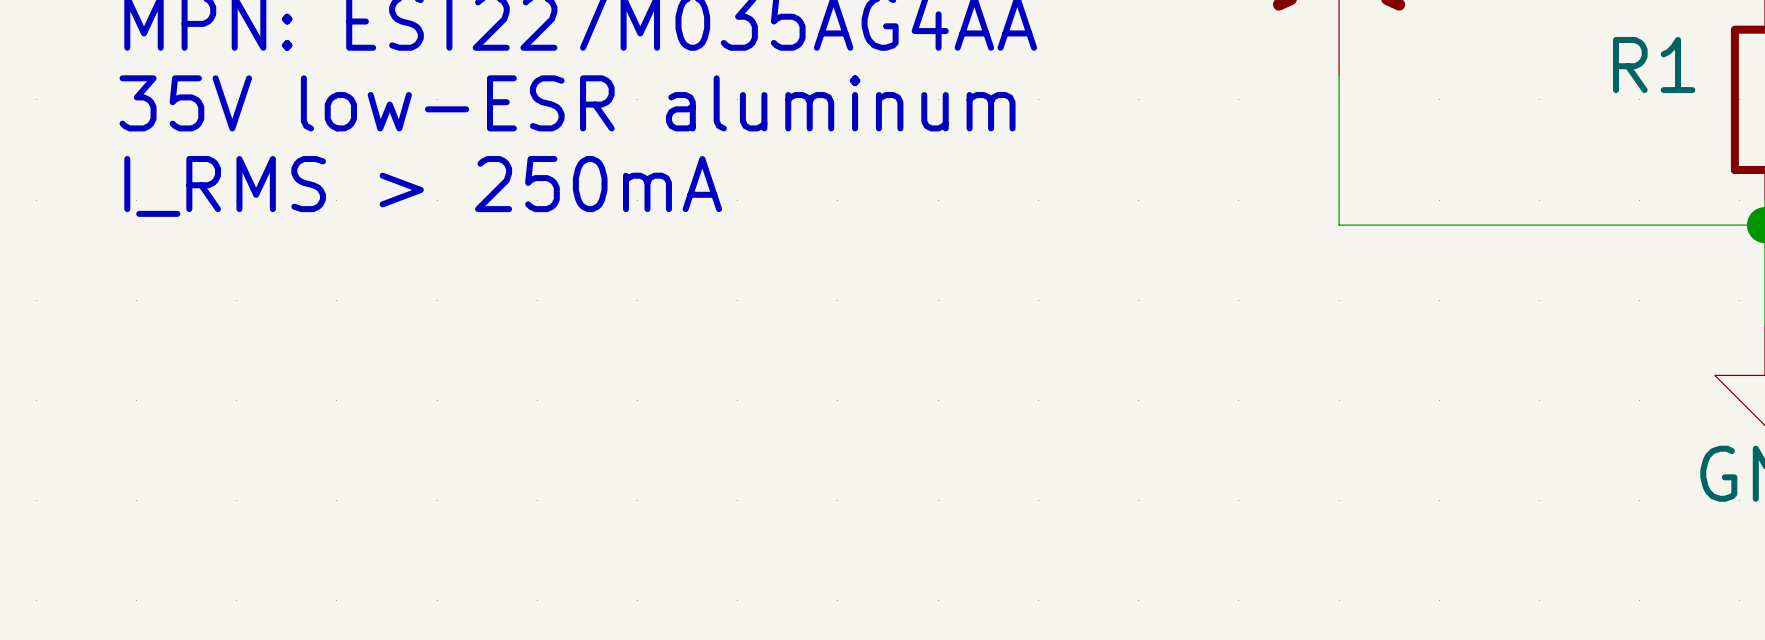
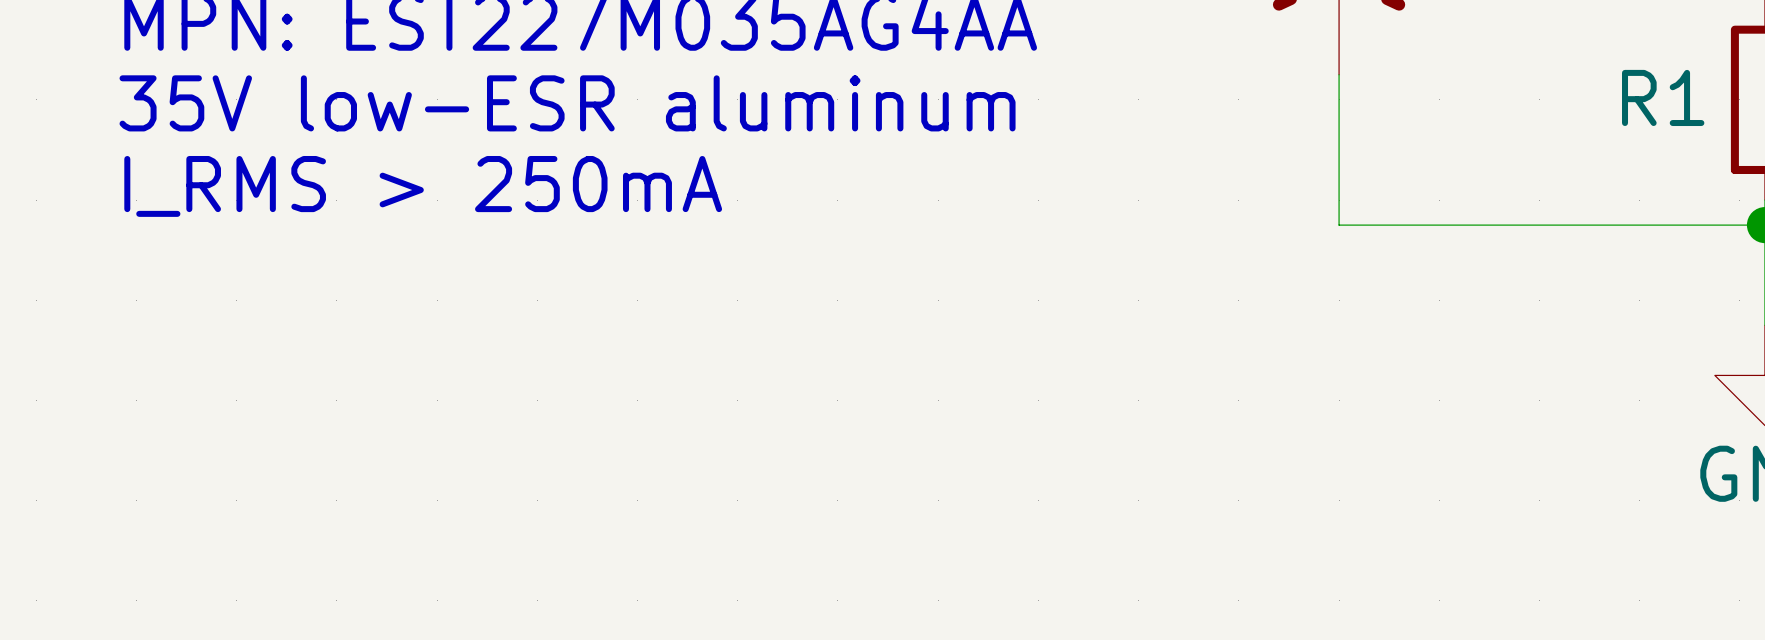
R1 name position: R1 (1654, 65) -> R1 (1663, 97)

